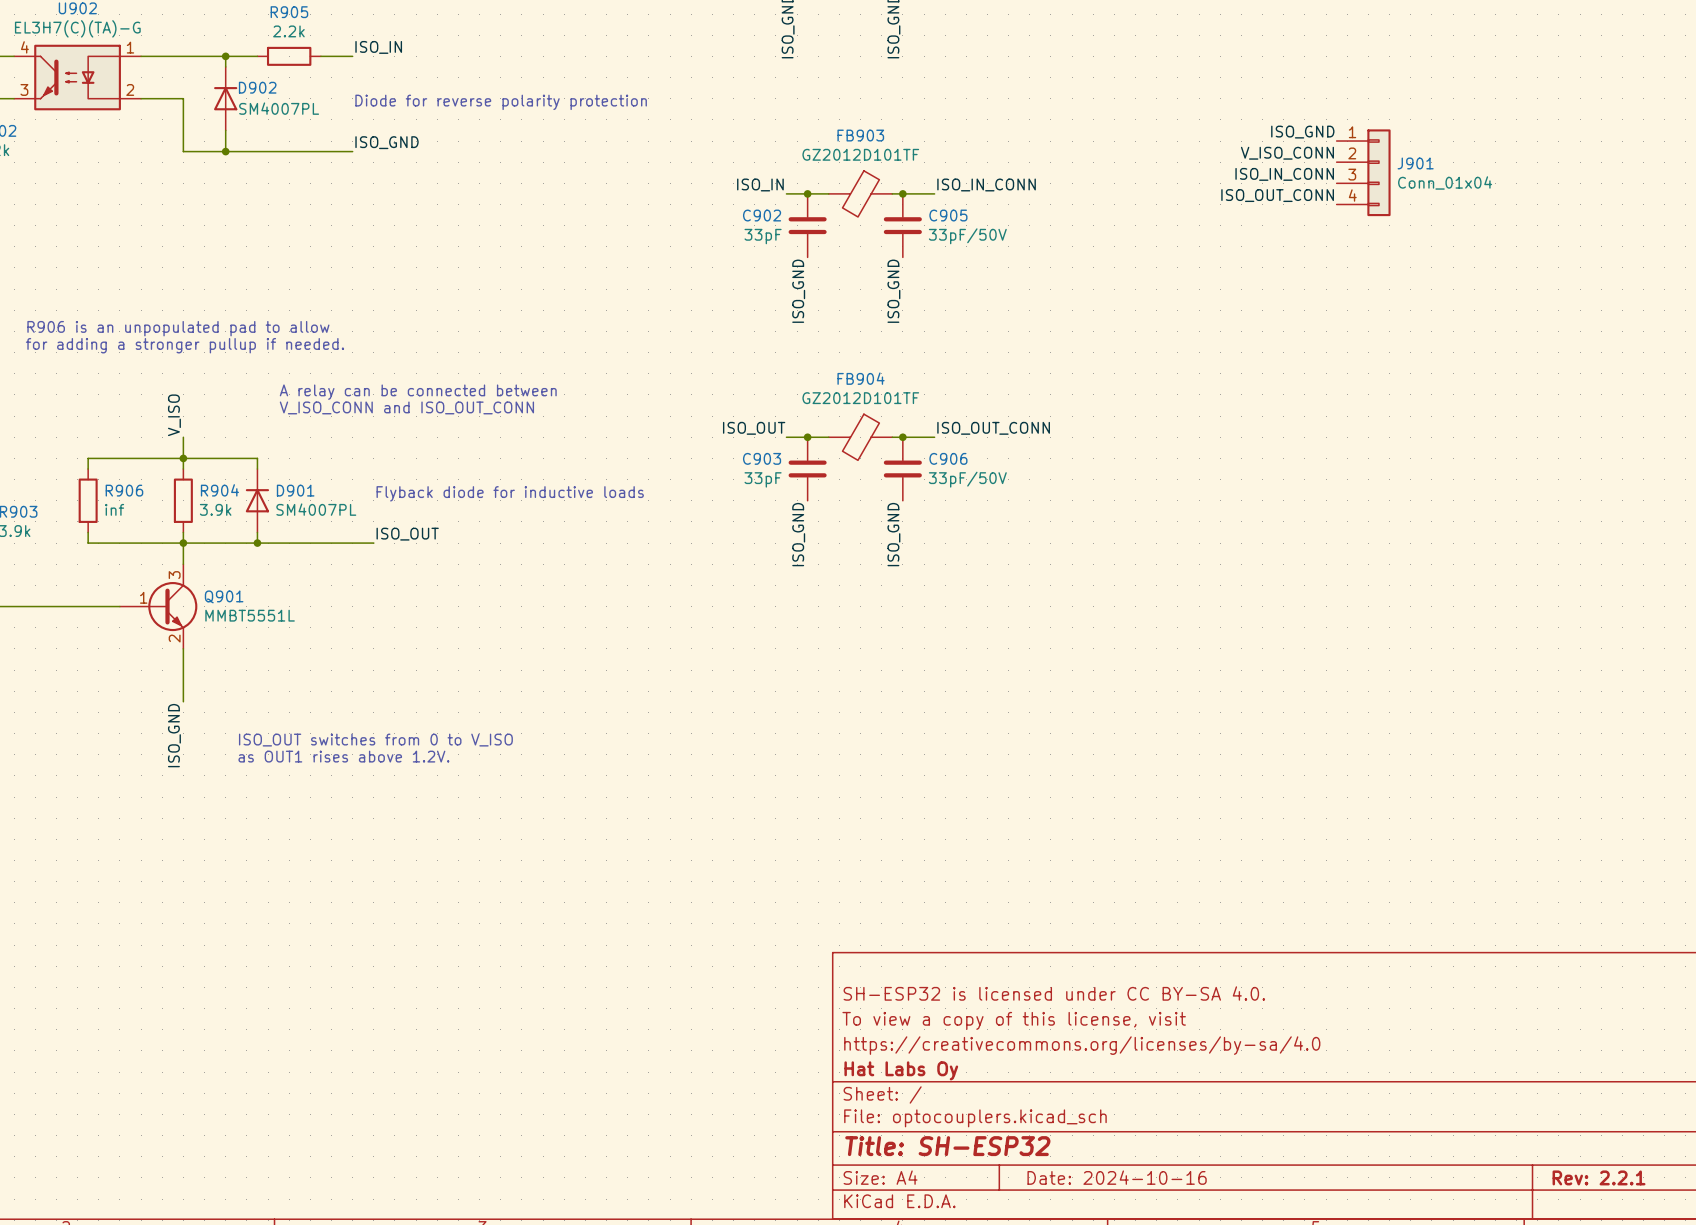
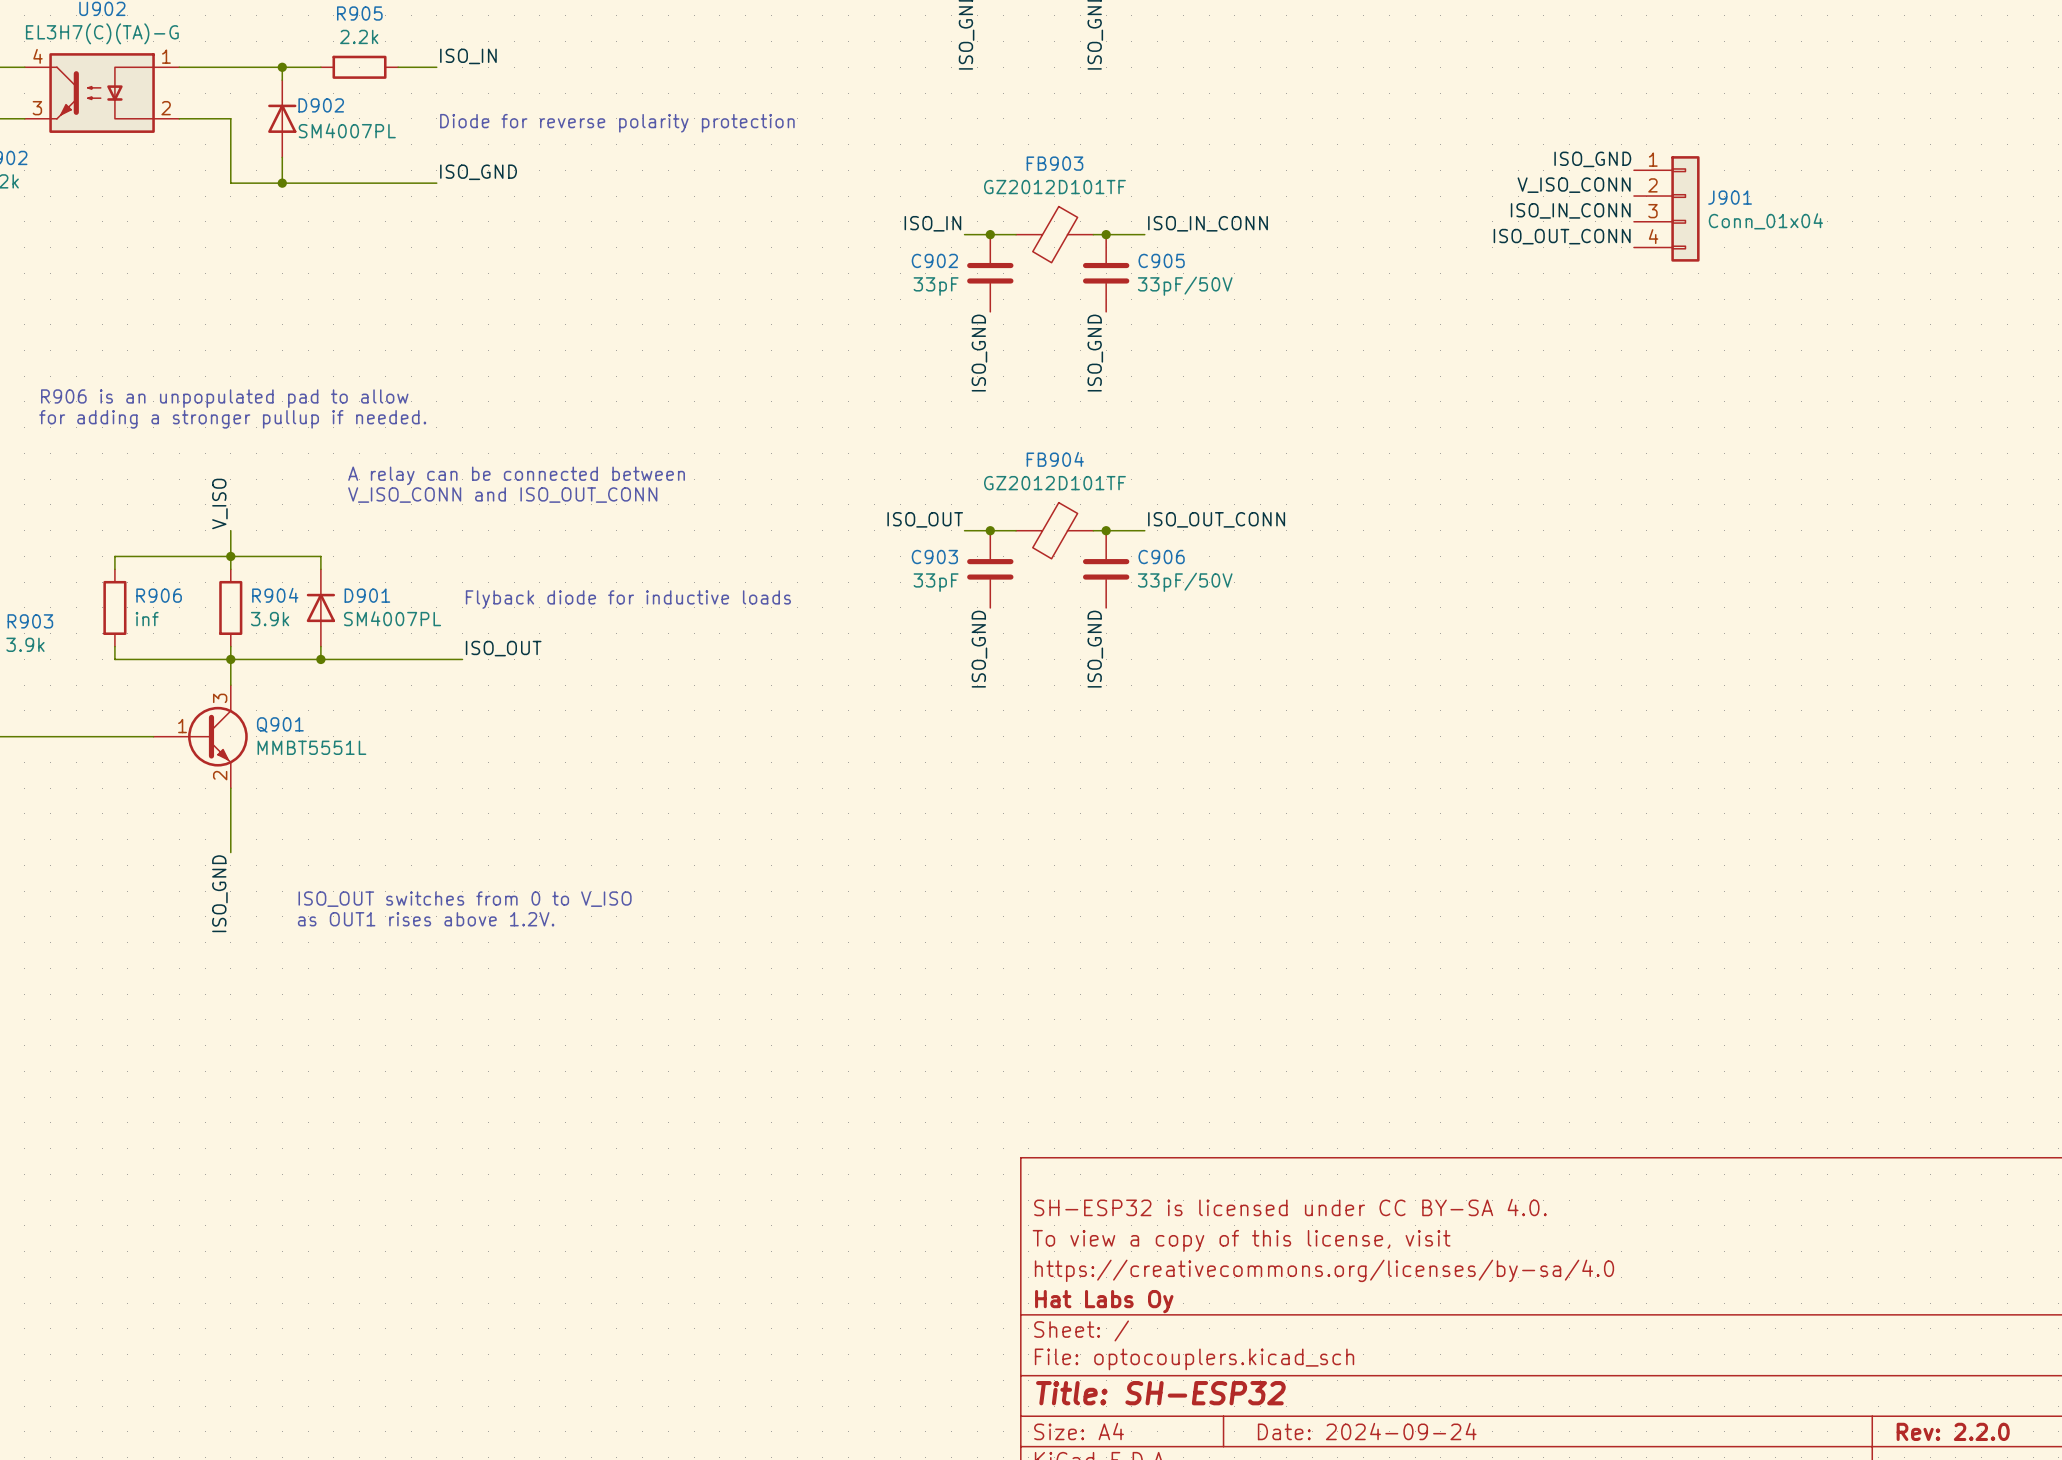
title block: Date: 2024-10-16 (1117, 1177) -> Date: 2024-09-24 (1367, 1431)
title block: Rev: 2.2.1 (1599, 1177) -> Rev: 2.2.0 (1953, 1431)

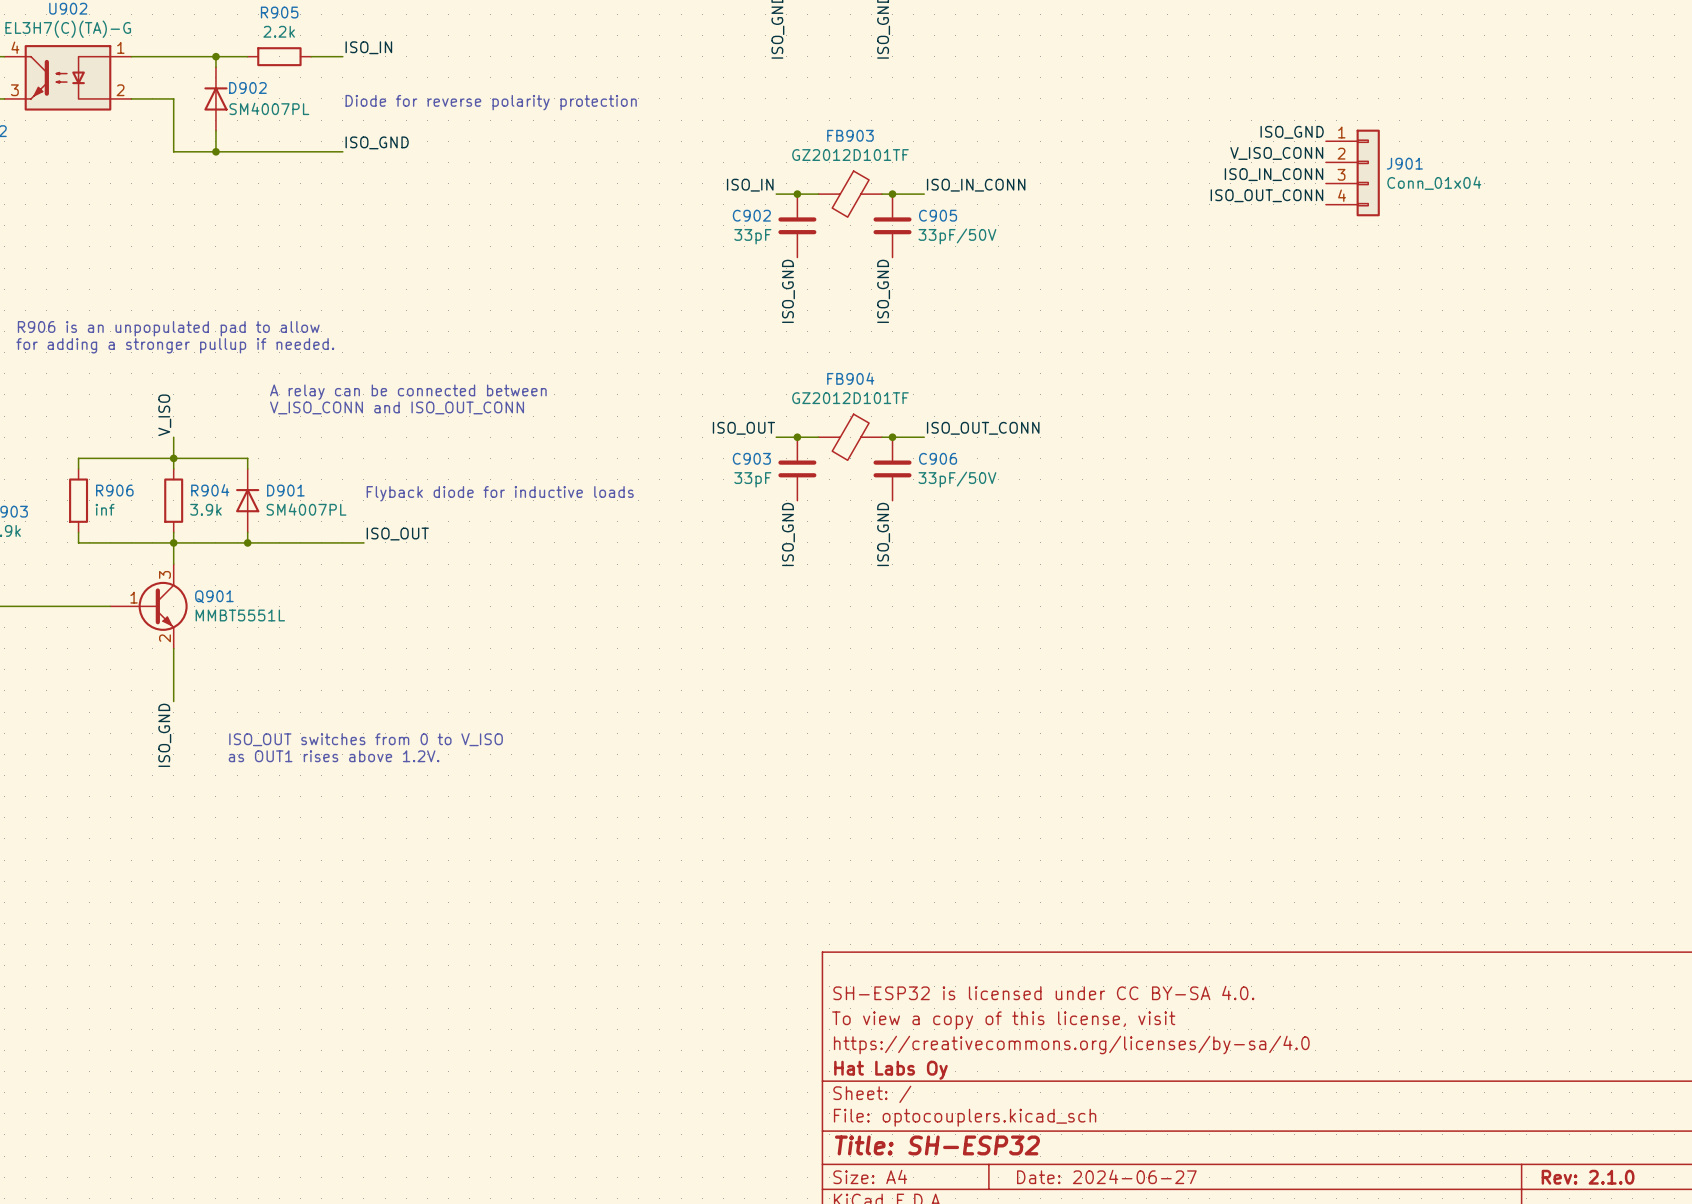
title block: Date: 2024-09-24 (1367, 1431) -> Date: 2024-06-27 (1106, 1176)
title block: Rev: 2.2.0 (1953, 1431) -> Rev: 2.1.0 (1588, 1177)

